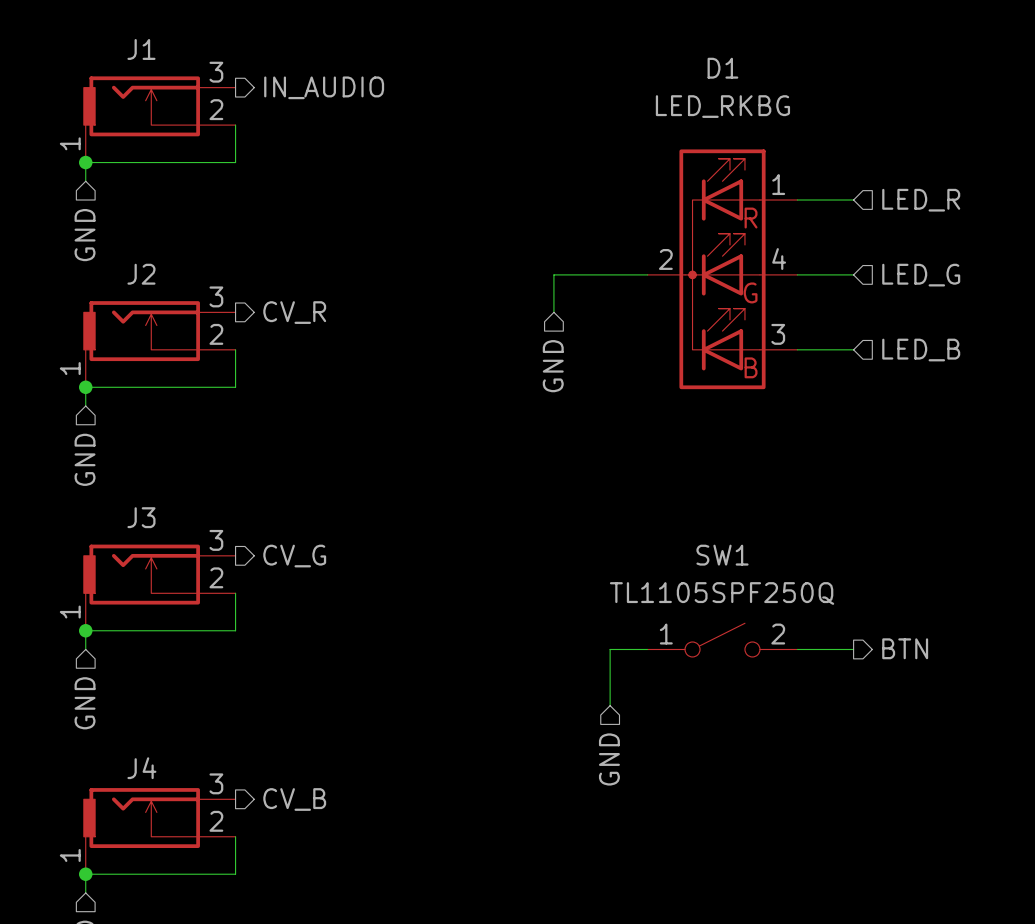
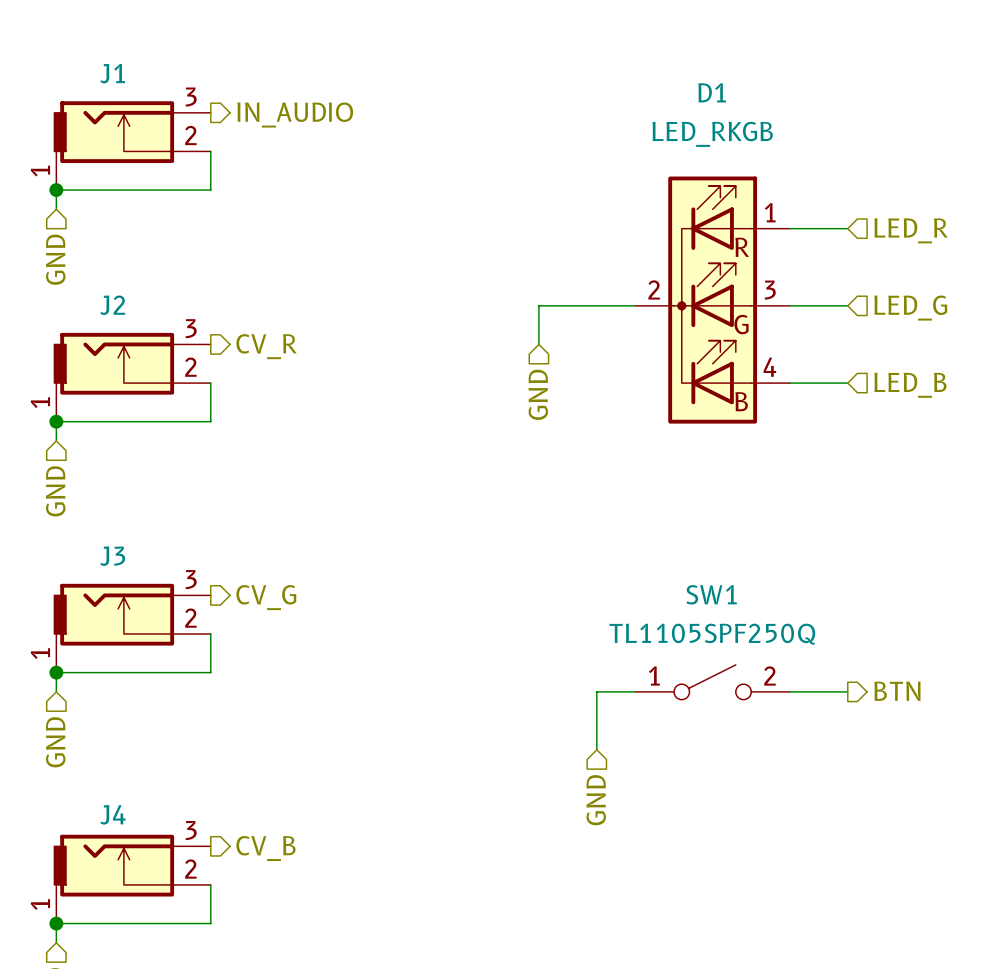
D1 value: LED_RKBG (722, 106) -> LED_RKGB (712, 134)
D1 pin number: 4 (779, 259) -> 3 (770, 290)
D1 pin number: 3 (778, 334) -> 4 (769, 367)

